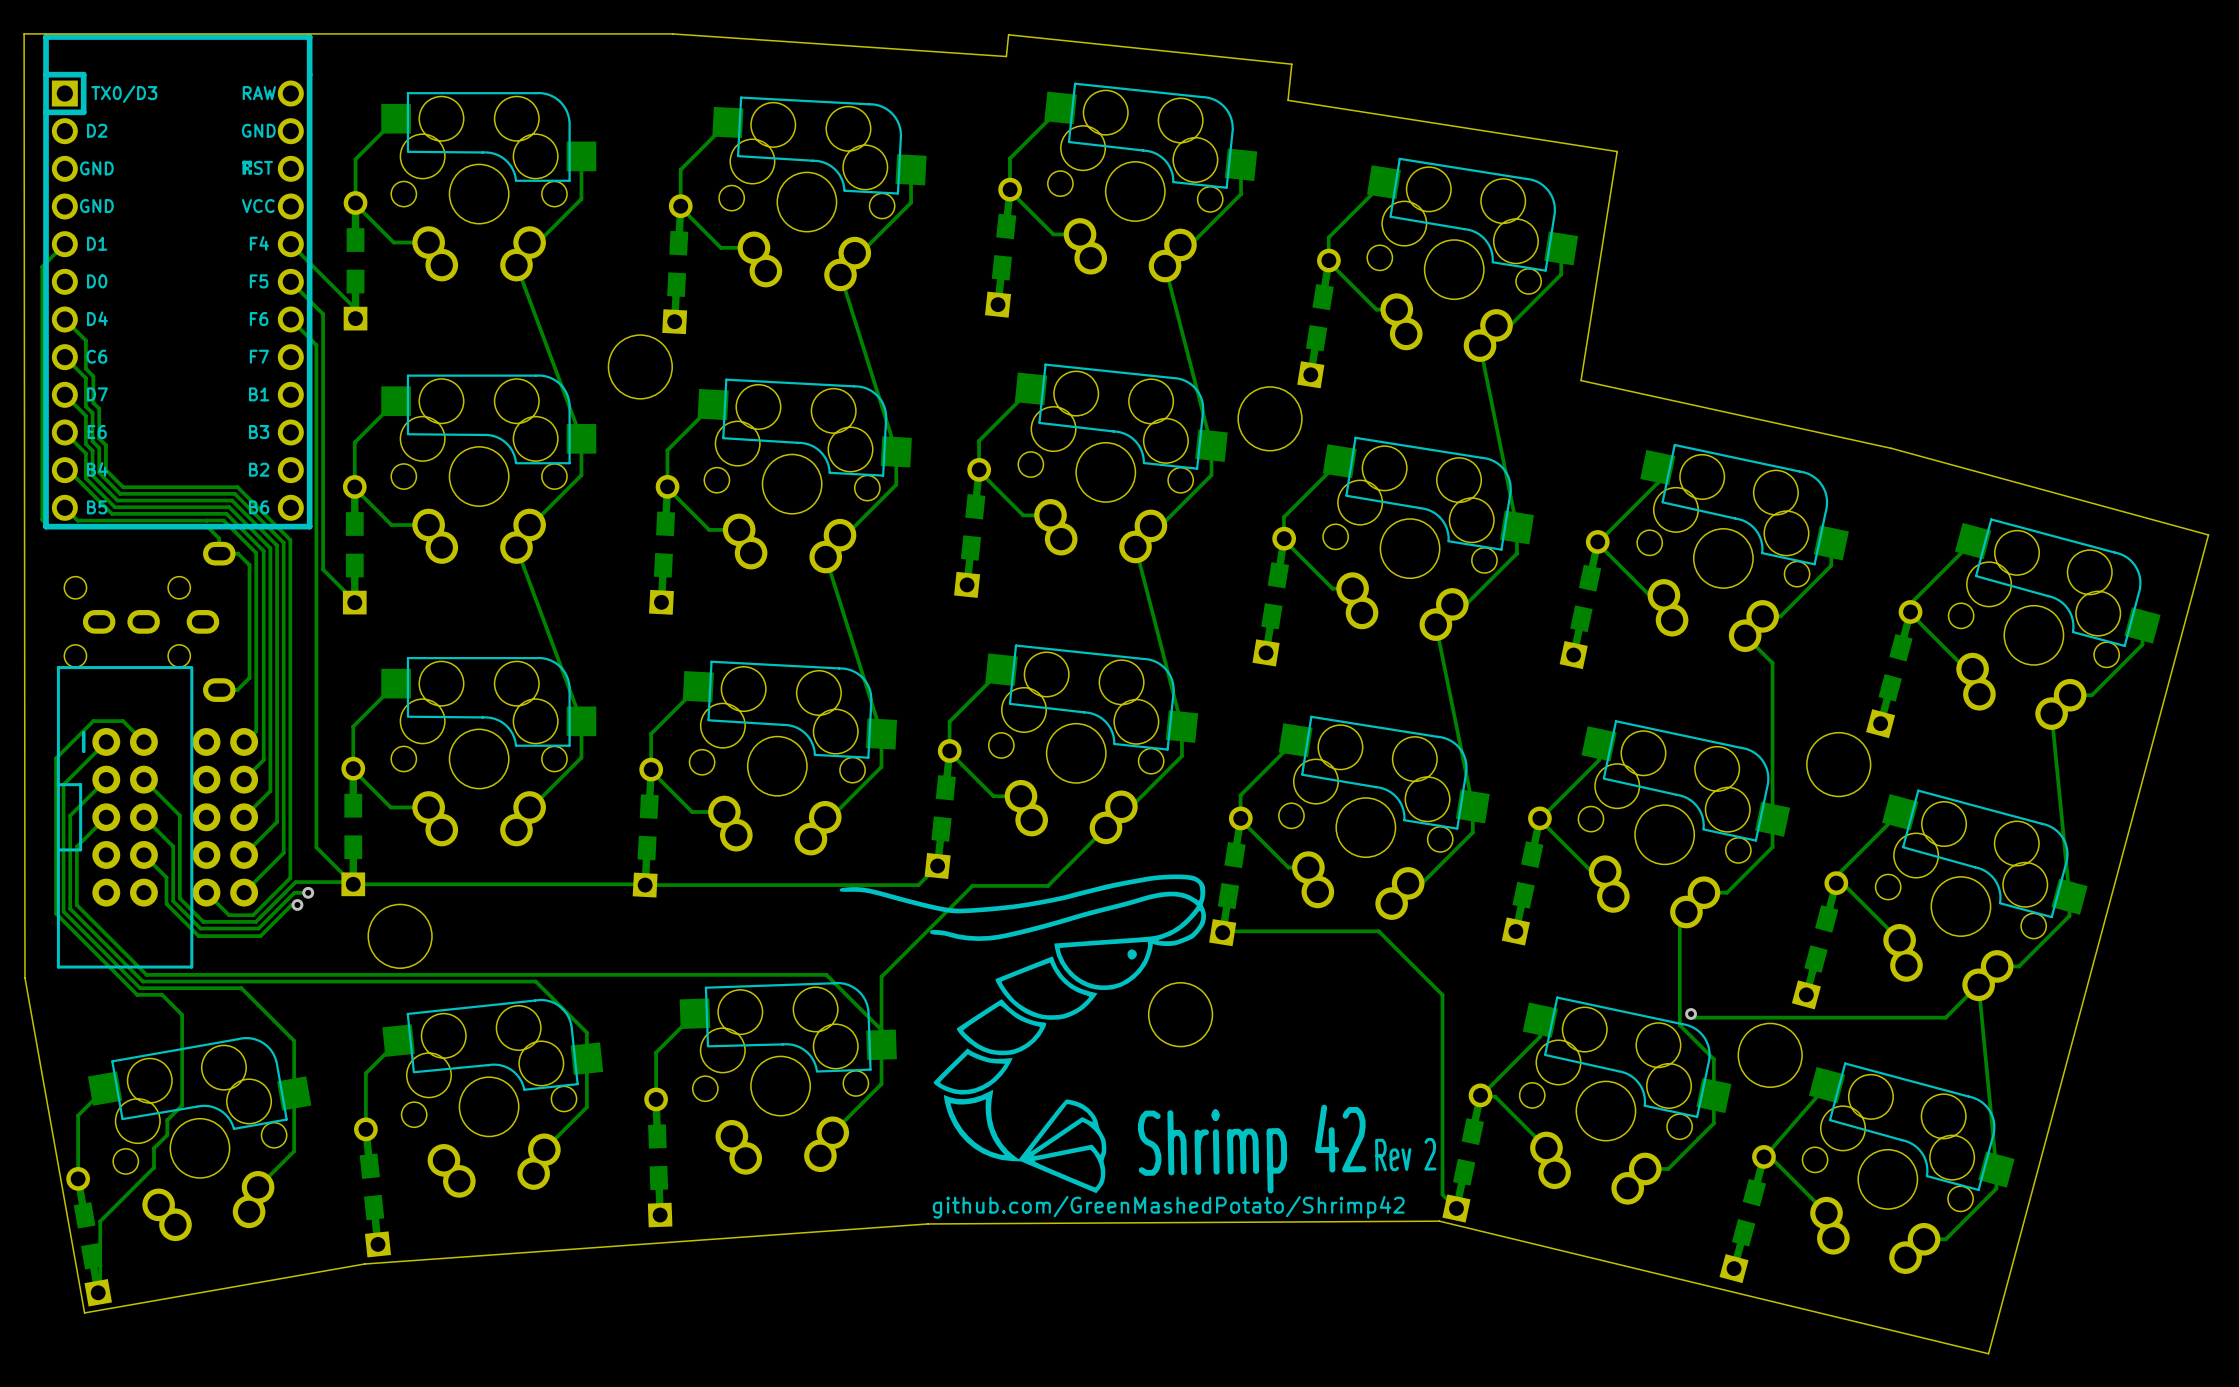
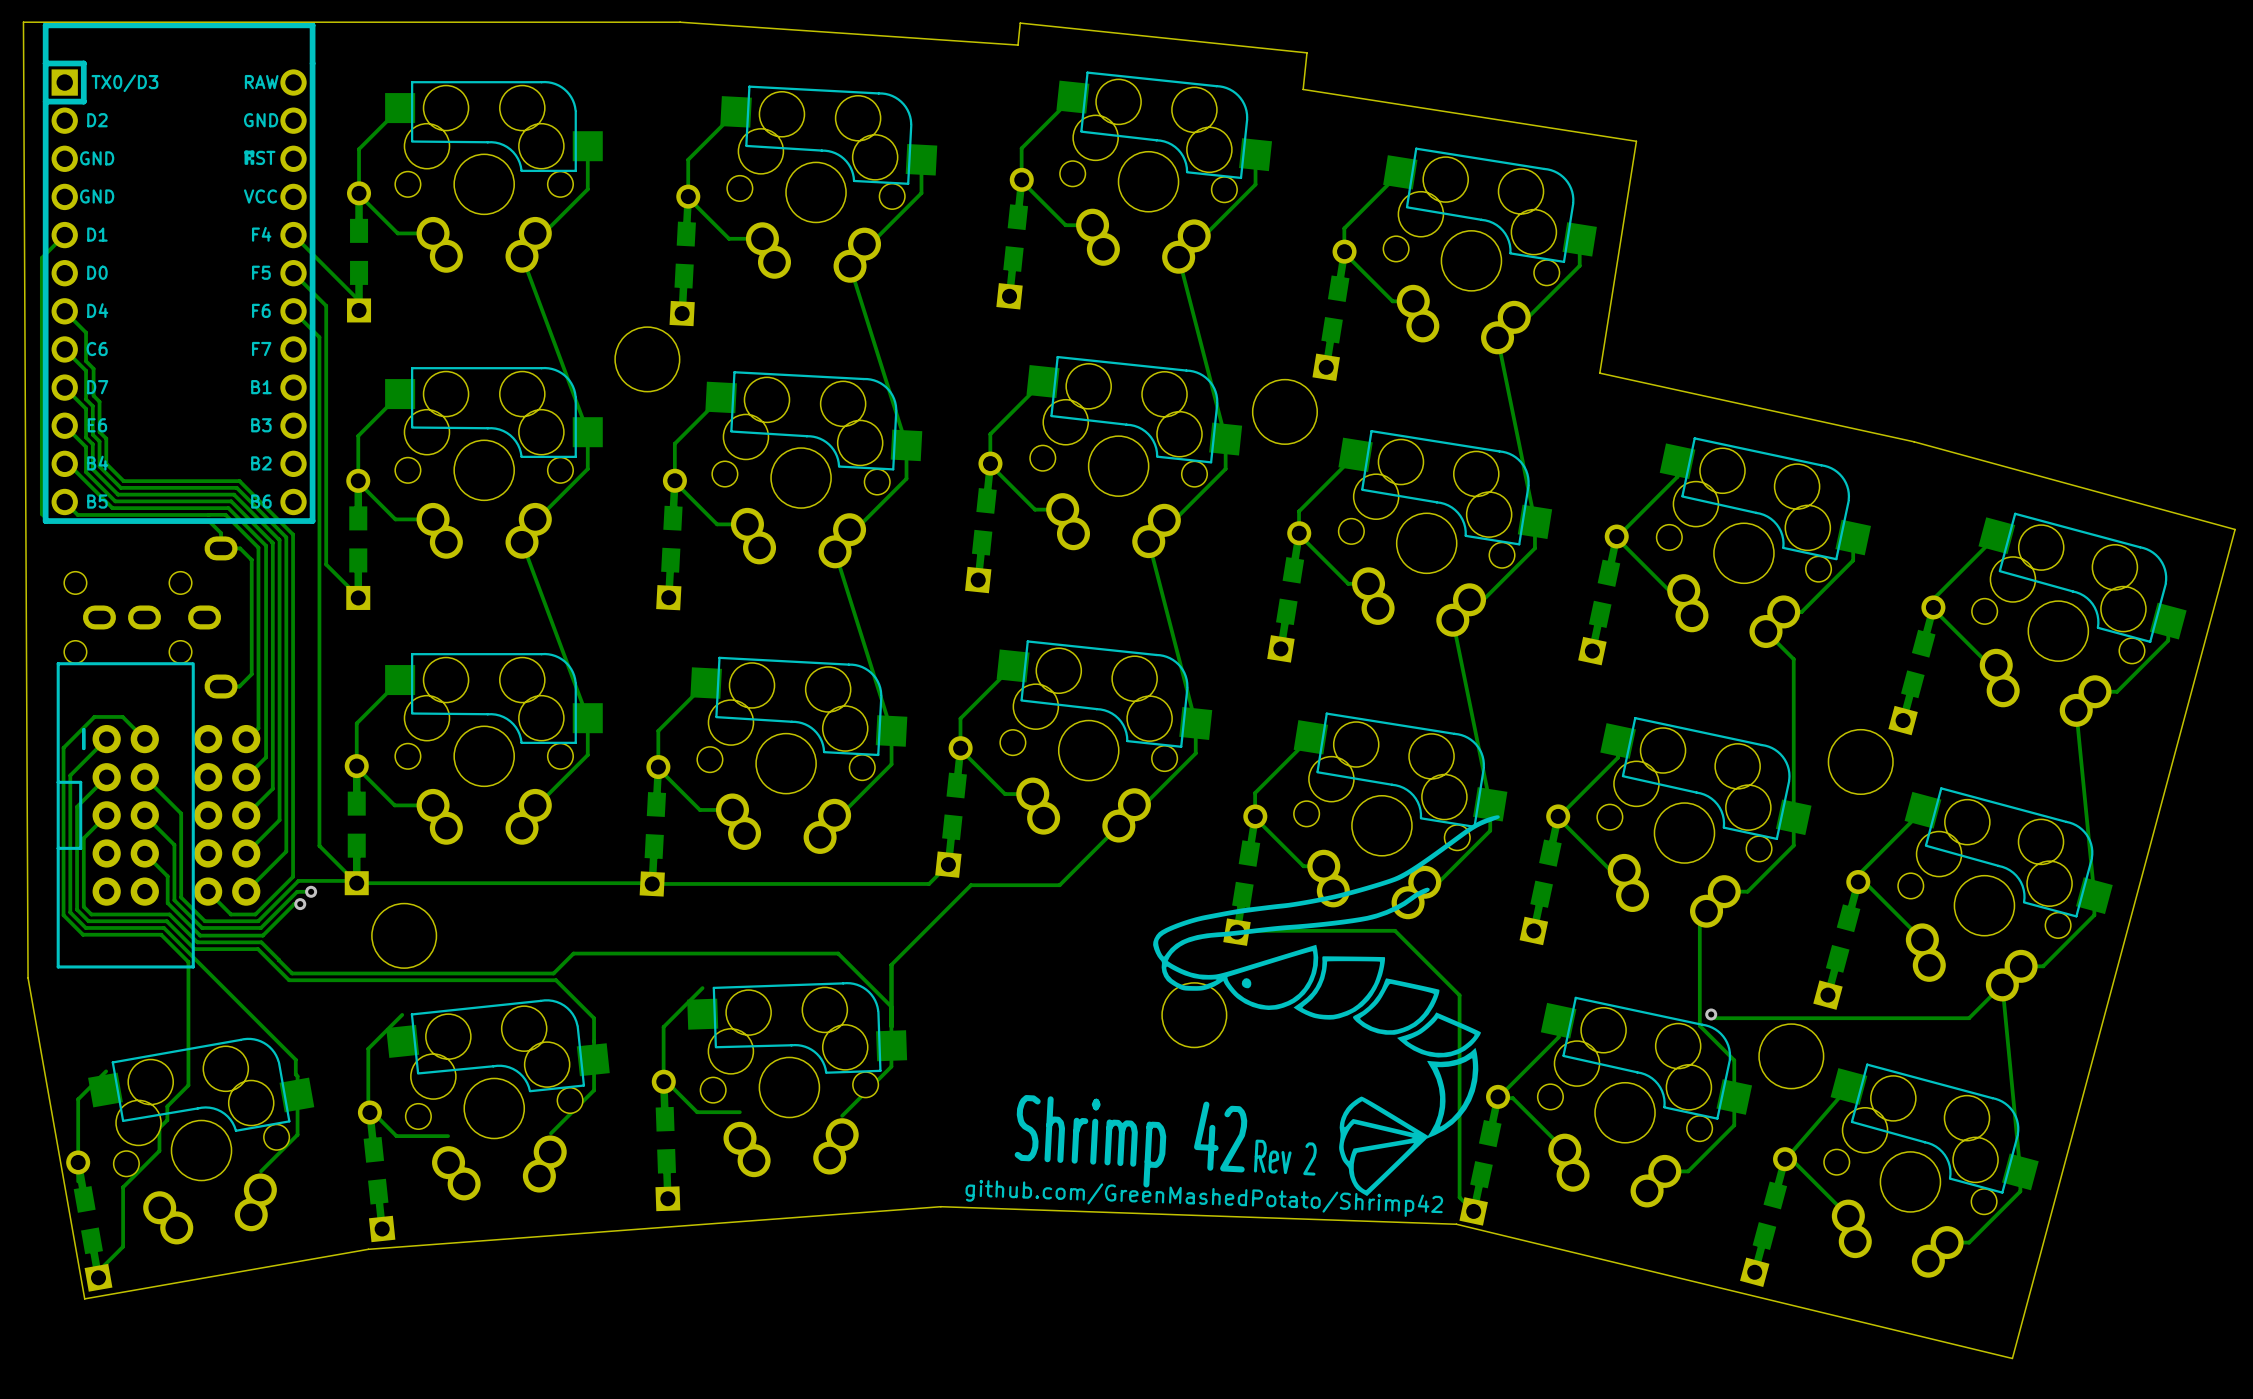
board edge: (24, 33) (24, 977) (84, 1312) (364, 1264) (927, 1223) (1439, 1221) -> (23, 22) (28, 977) (84, 1298) (368, 1249) (940, 1206) (1456, 1224)
track: (123, 721) (93, 721) (56, 758) (56, 913) (137, 994) (162, 994) (182, 1014) (182, 1105) (167, 1120) (167, 1135) (153, 1148) (153, 1167) (100, 1221) (100, 1290) (98, 1292) -> (123, 717) (94, 716) (63, 747) (63, 915) (83, 934) (161, 934) (188, 961) (188, 1085) (167, 1106) (167, 1120) (159, 1128) (159, 1150) (123, 1187) (123, 1246) (97, 1272)
track: (70, 777) (63, 784) (63, 911) (140, 988) (241, 988) (294, 1040) (294, 1151) (258, 1187) -> (70, 775) (70, 912) (85, 927) (163, 927) (295, 1059) (297, 1134) (261, 1171)
track: (77, 808) (70, 815) (70, 908) (142, 981) (535, 981) (586, 1032) (586, 1107) (544, 1149) -> (77, 806) (77, 909) (88, 921) (166, 921) (194, 949) (257, 949) (289, 980) (556, 980) (594, 1018) (594, 1090) (550, 1133)
drawing: none -> [1153, 815, 1500, 1197]
track: (83, 839) (76, 846) (76, 905) (146, 974) (826, 974) (881, 1030) -> (83, 838) (83, 906) (91, 914) (169, 914) (197, 942) (261, 942) (292, 973) (553, 973) (573, 953) (838, 953) (891, 1006)
drawing: [839, 874, 1206, 1194] -> none
track: (1047, 885) (972, 885) (881, 976) -> (1060, 884) (971, 885) (891, 964) (891, 1066) (842, 1115)
track: none -> (702, 988) (663, 1027) (663, 1078) (697, 1112) (739, 1112)
track: (694, 1013) (656, 1052) (656, 1099) -> none
track: none -> (402, 1014) (368, 1048) (368, 1107) (396, 1136) (448, 1136)
track: (881, 1026) (881, 1083) (832, 1132) -> none
track: (398, 1040) (365, 1073) (365, 1129) -> none
track: (105, 1088) (78, 1115) -> (106, 1071) (78, 1099) (78, 1117)
text rotation: 0° (1252, 1149) -> 4° clockwise (1130, 1141)
text rotation: 0° (1405, 1154) -> 4° clockwise (1285, 1157)
text position: Rev 2 (1405, 1154) -> Rev 2 (1285, 1157)
part position: (658, 1157) -> (666, 1140)
part position: (372, 1187) -> (376, 1171)
text rotation: 0° (1168, 1207) -> 2° clockwise (1204, 1198)
part position: (89, 1236) -> (89, 1221)

